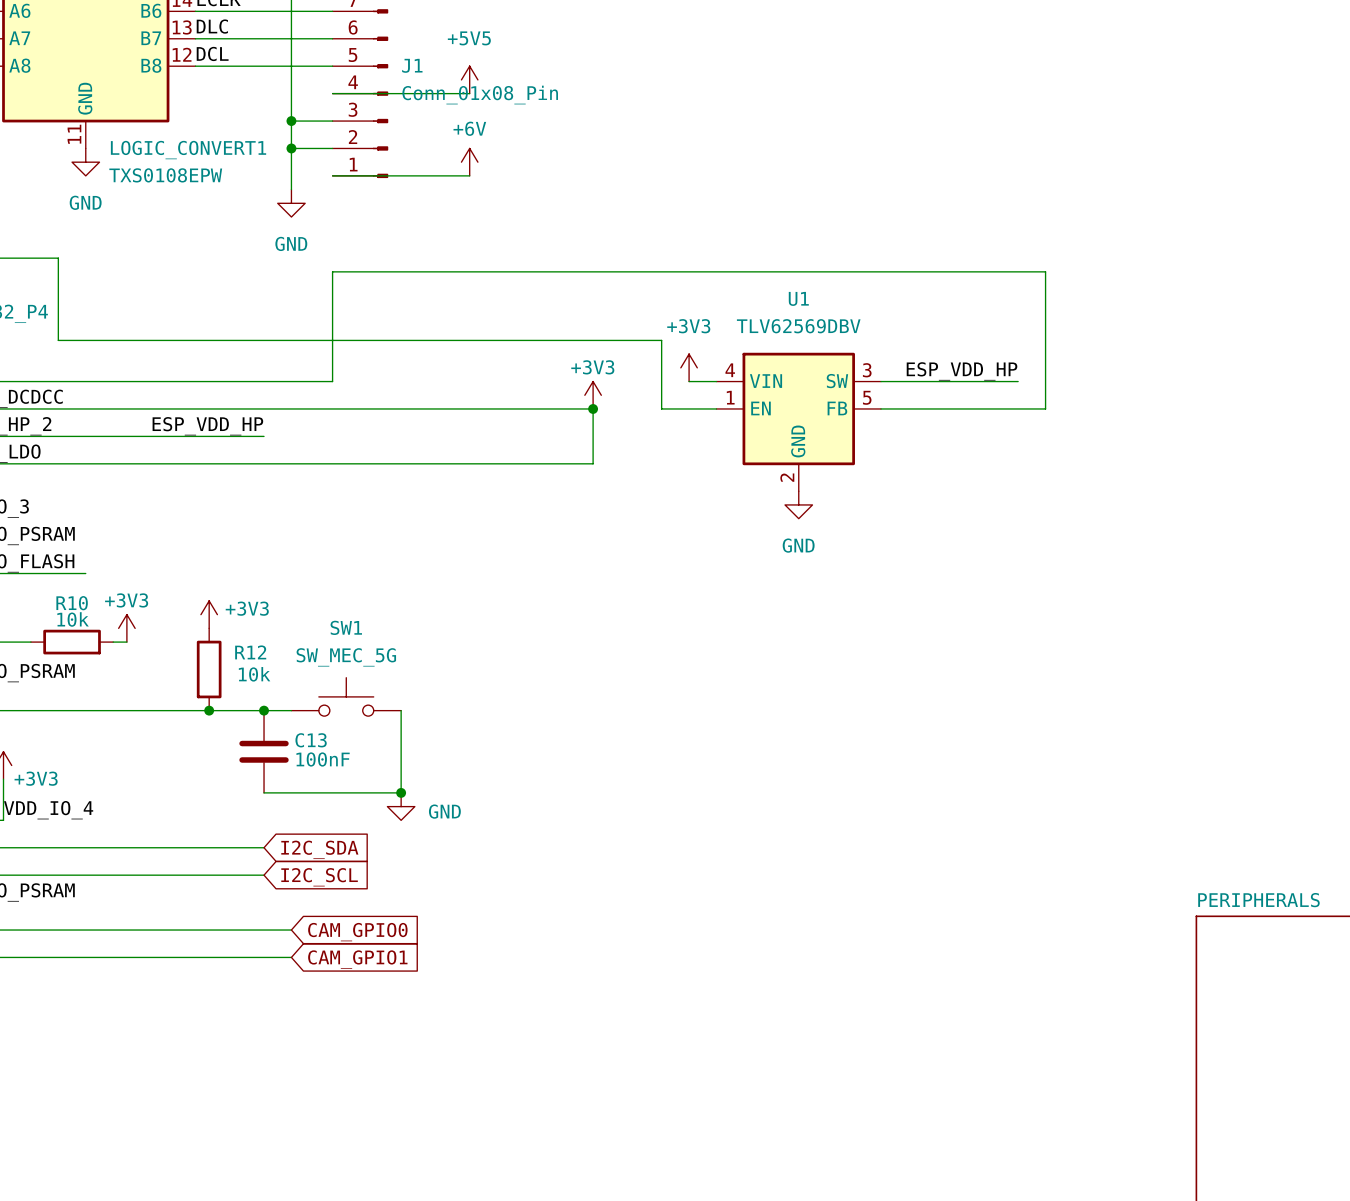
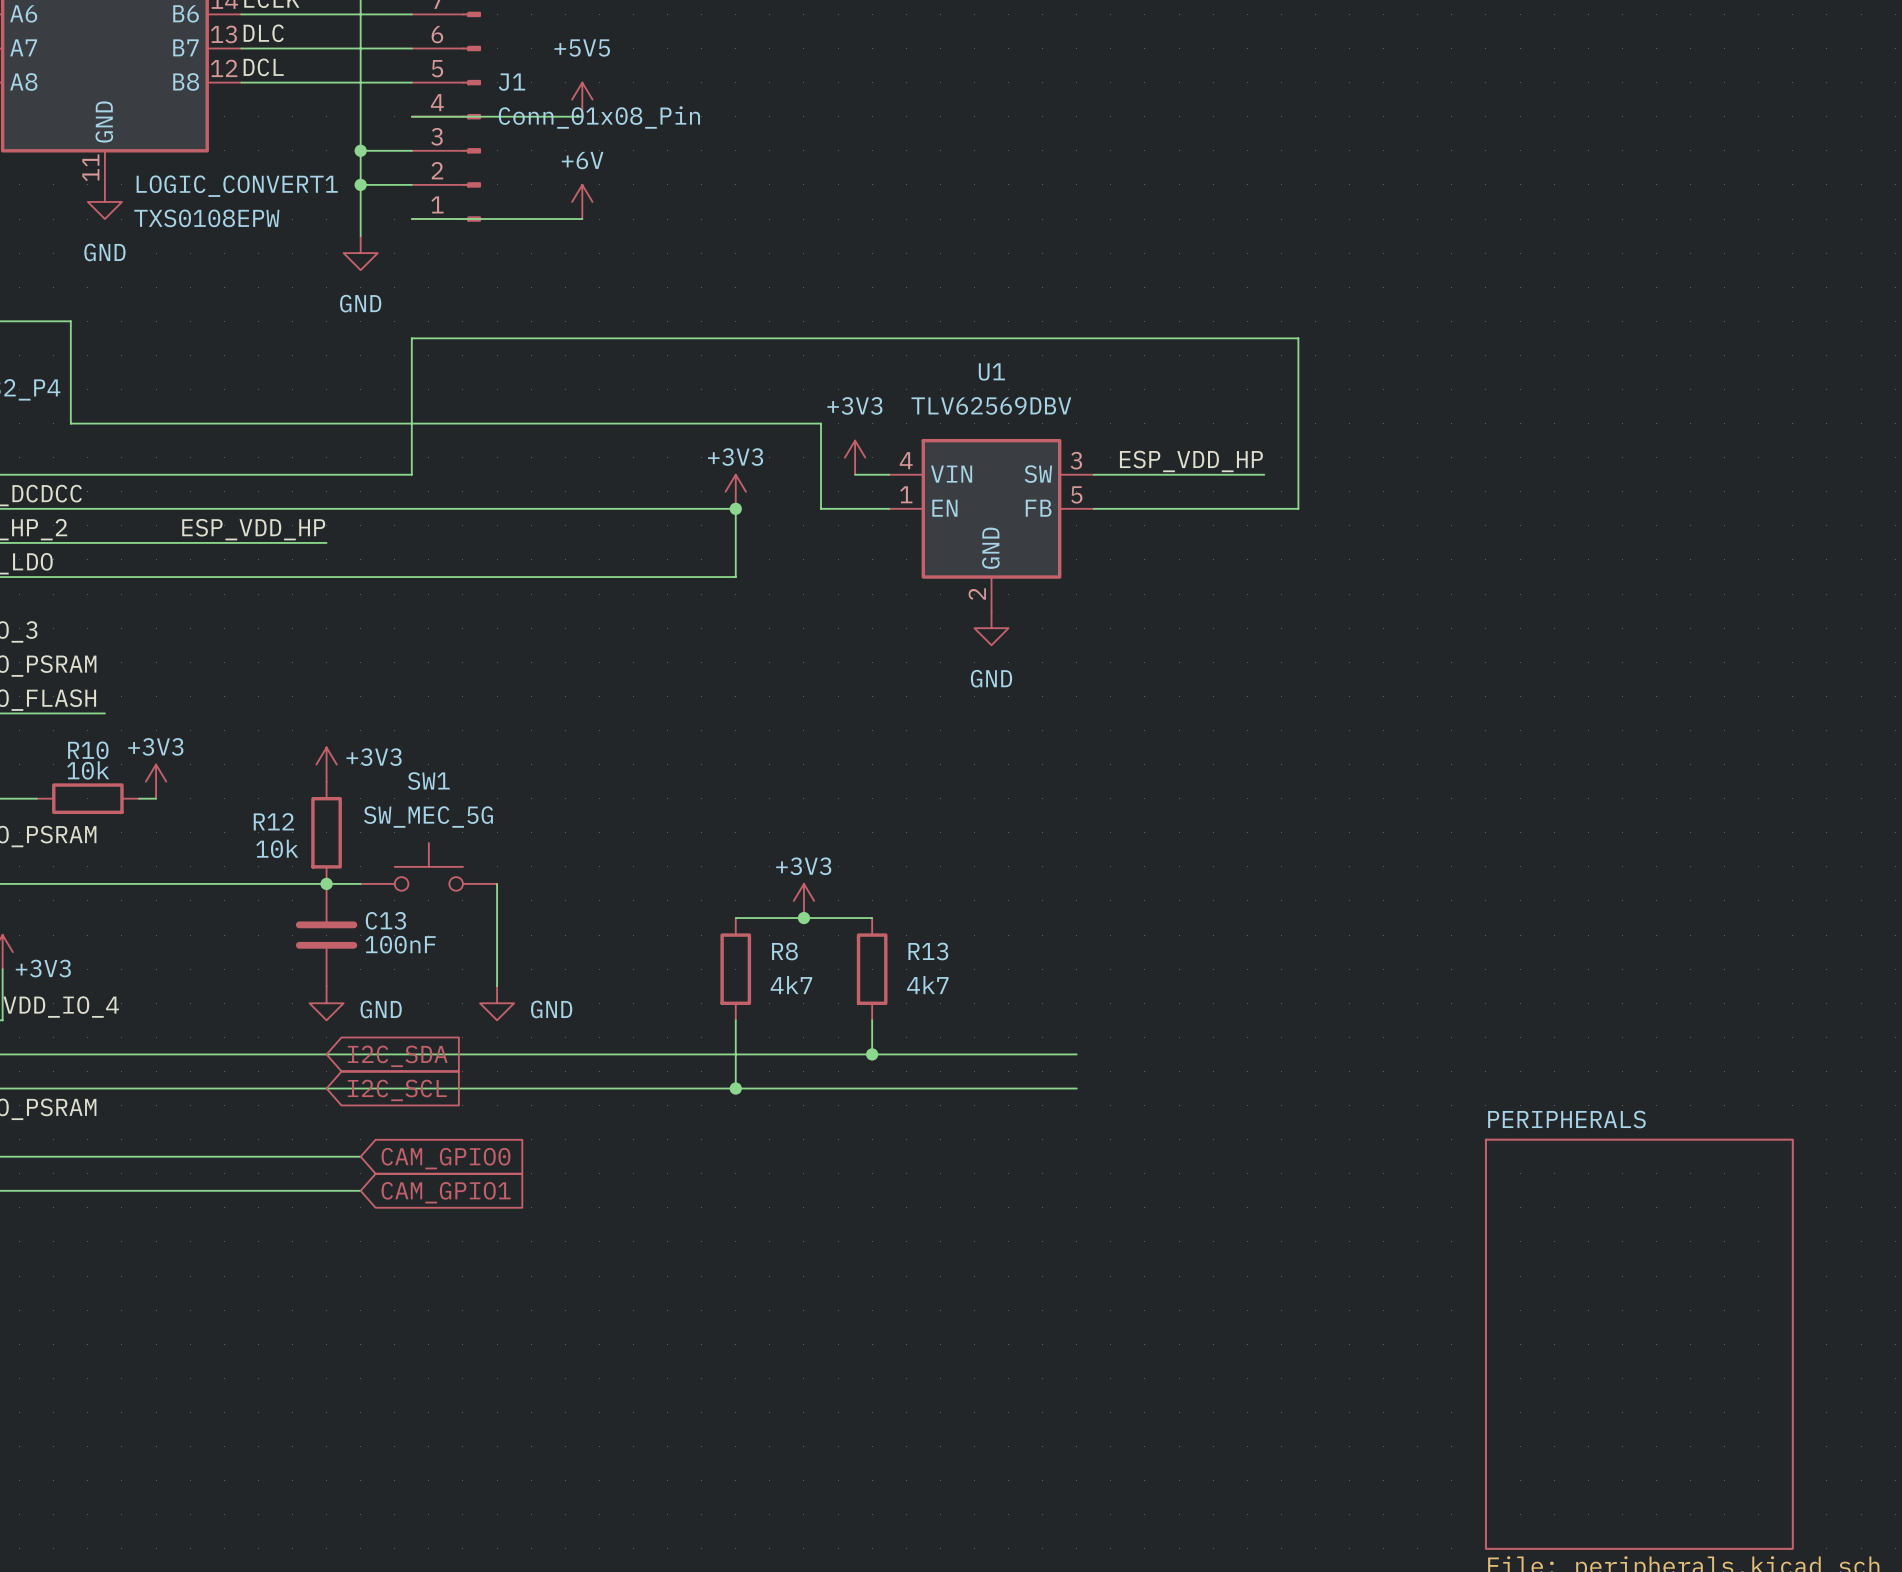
power symbol position: +3V3 (209, 614) -> +3V3 (326, 764)
R12 name position: R12 (250, 652) -> R12 (273, 821)
R12 position: (209, 669) -> (326, 832)
R12 value position: 10k (254, 674) -> 10k (277, 848)
junction: (209, 710) -> none
power symbol: none -> +3V3 (803, 900)
wire: none -> (735, 918) (872, 918)
junction: none -> (803, 918)
R8: none -> 4k7 (735, 969)
R13: none -> 4k7 (872, 969)
wire: (264, 792) (401, 792) -> none
junction: (401, 792) -> none
power symbol: none -> GND (326, 1003)
wire: none -> (735, 1020) (735, 1088)
wire: none -> (872, 1020) (872, 1054)
wire: none -> (326, 1054) (1076, 1054)
junction: none -> (872, 1054)
wire: none -> (326, 1088) (1076, 1088)
junction: none -> (735, 1088)

